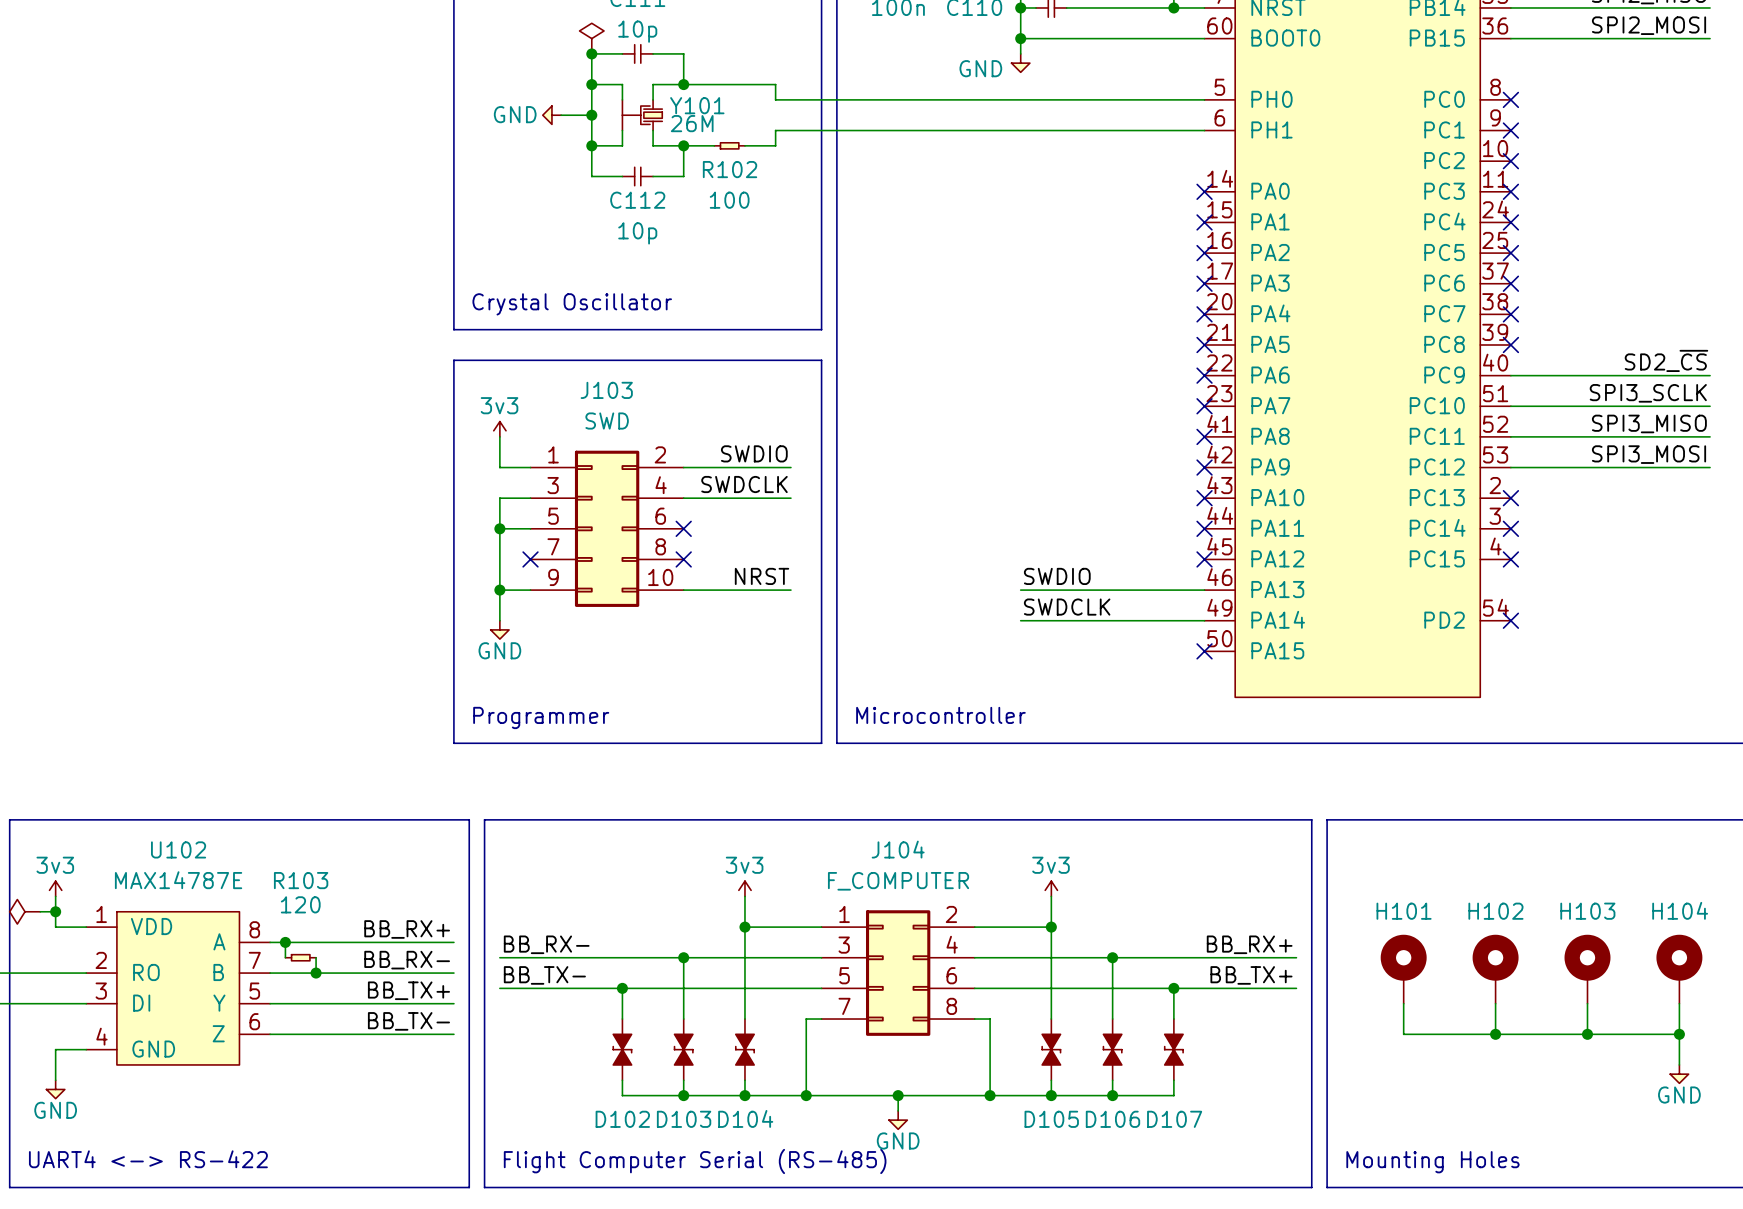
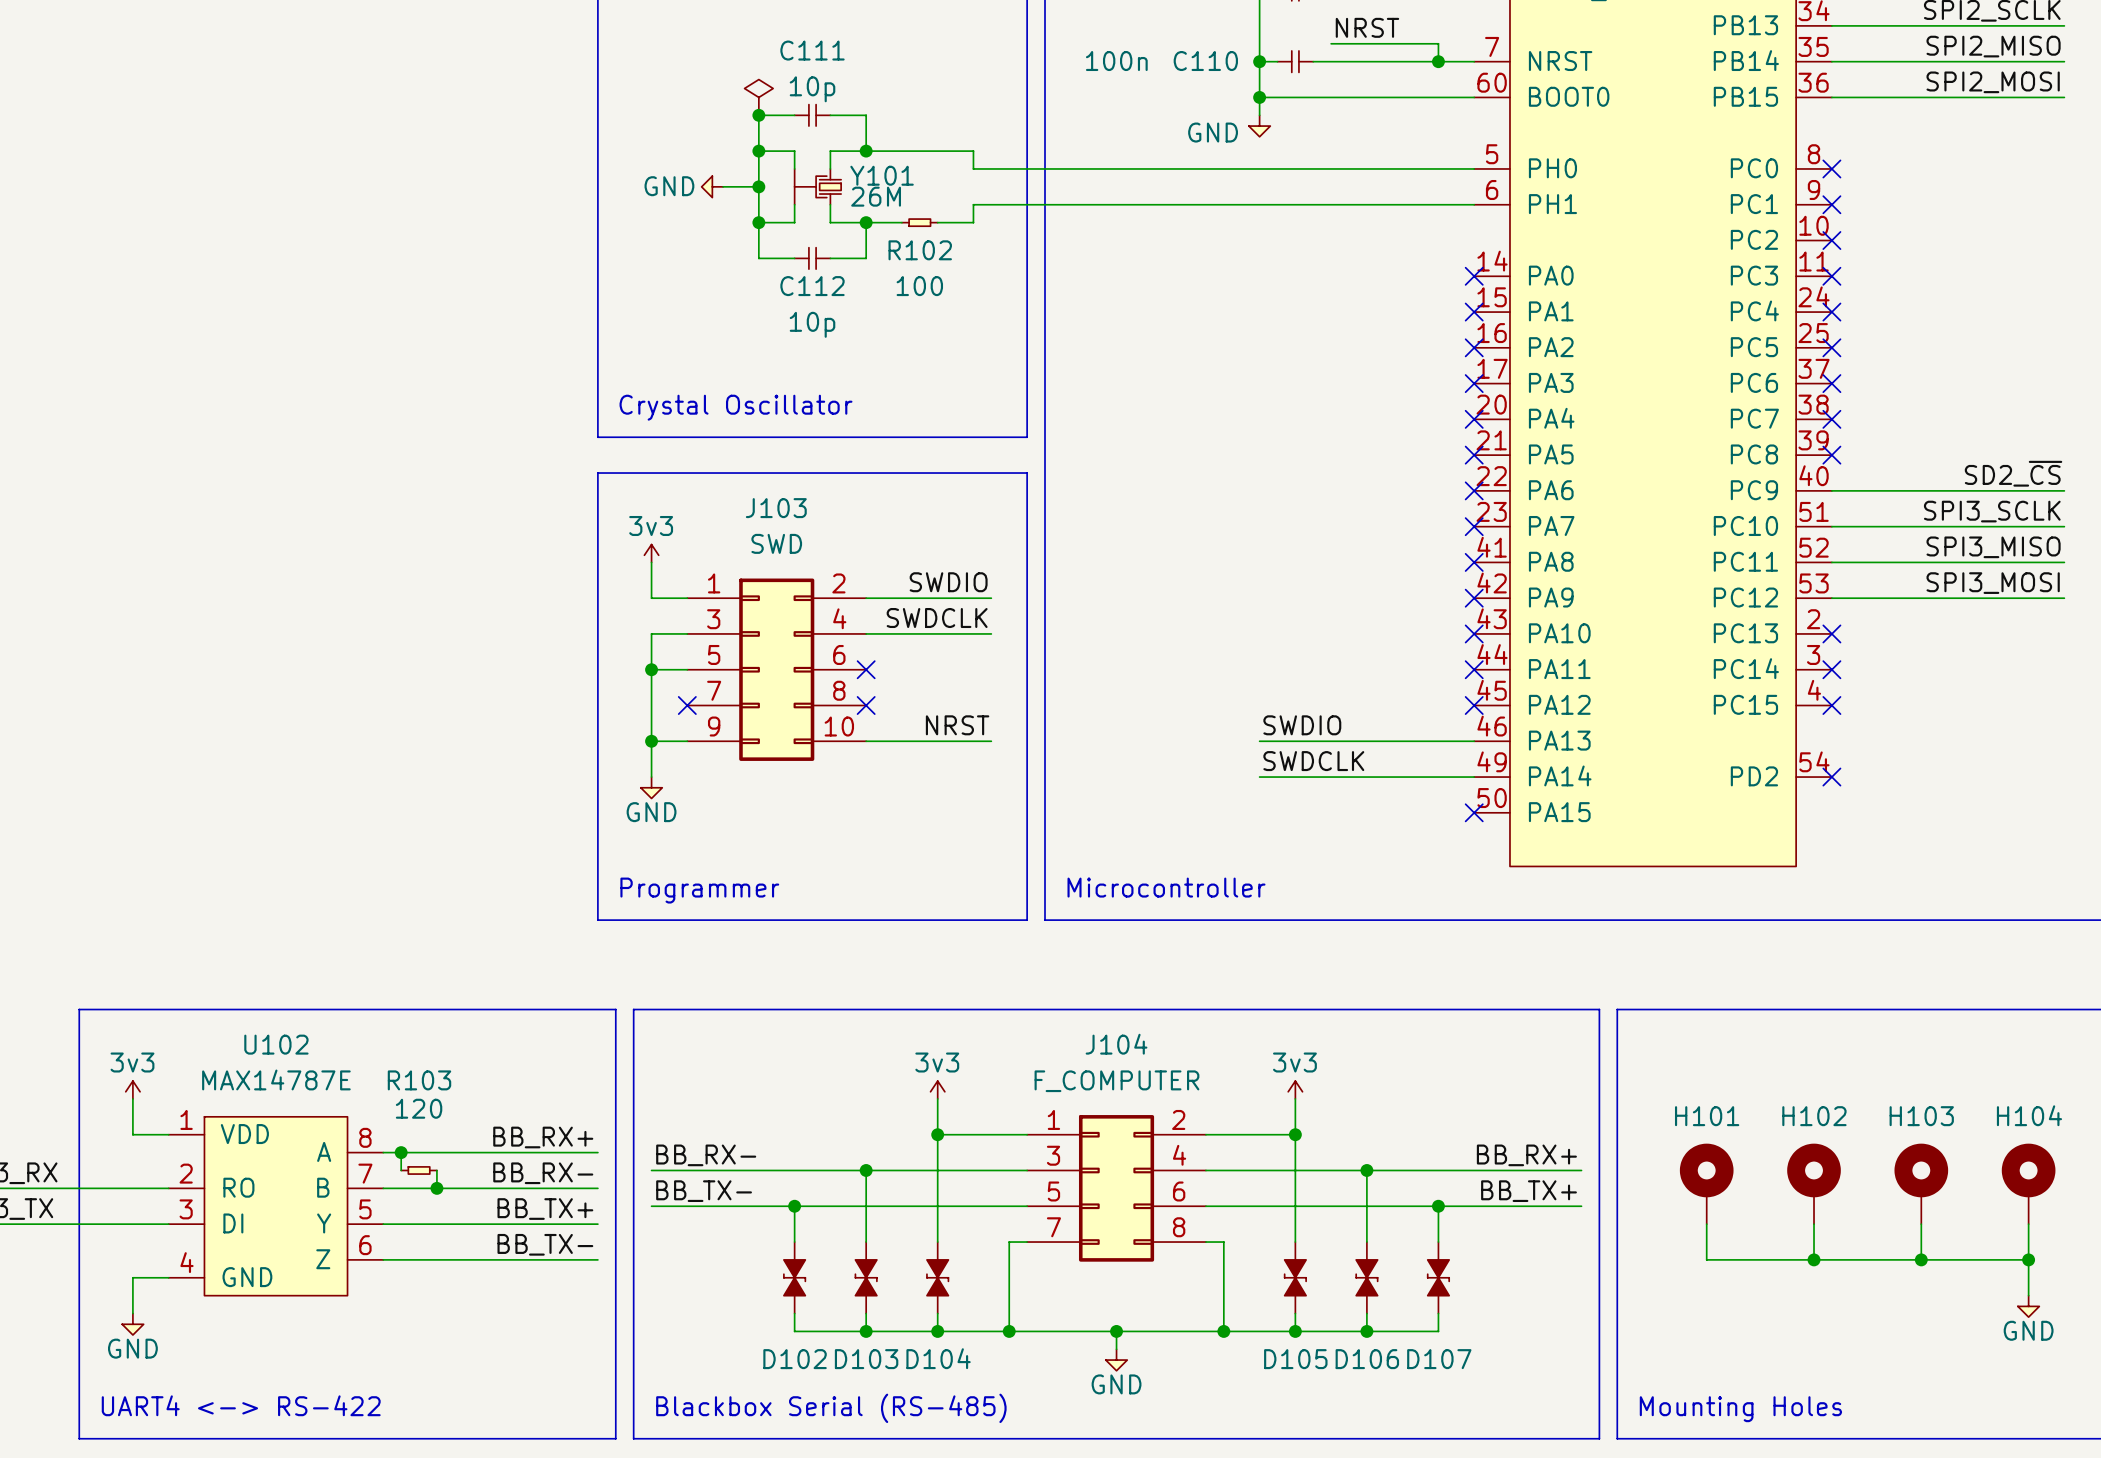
power symbol: (25, 911) -> none
wire: (40, 911) (55, 911) -> none
junction: (55, 911) -> none
text: Flight Computer Serial (RS-485) (695, 1161) -> Blackbox Serial (RS-485) (831, 1408)

